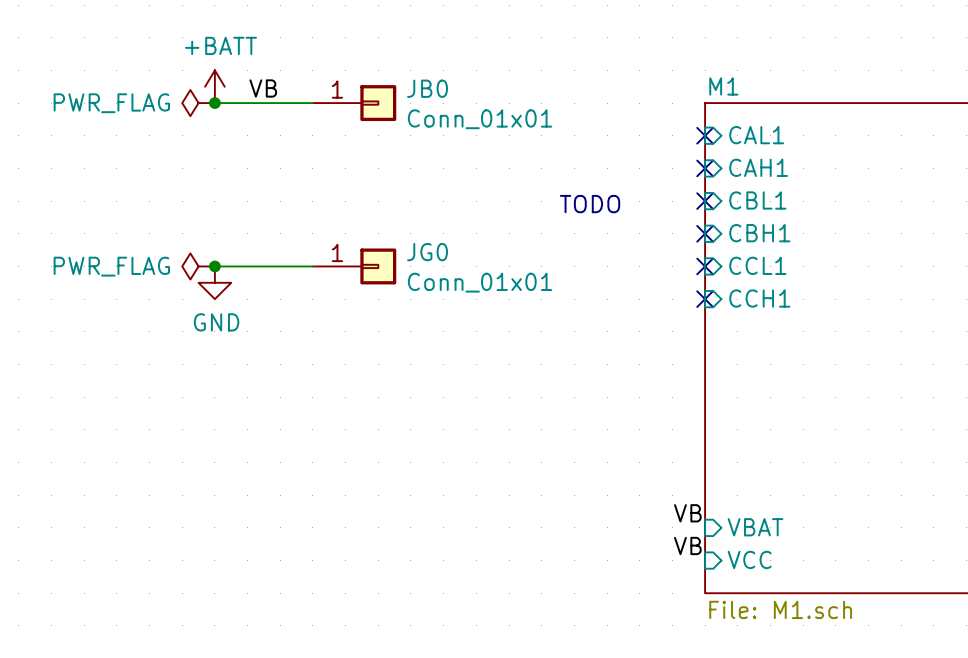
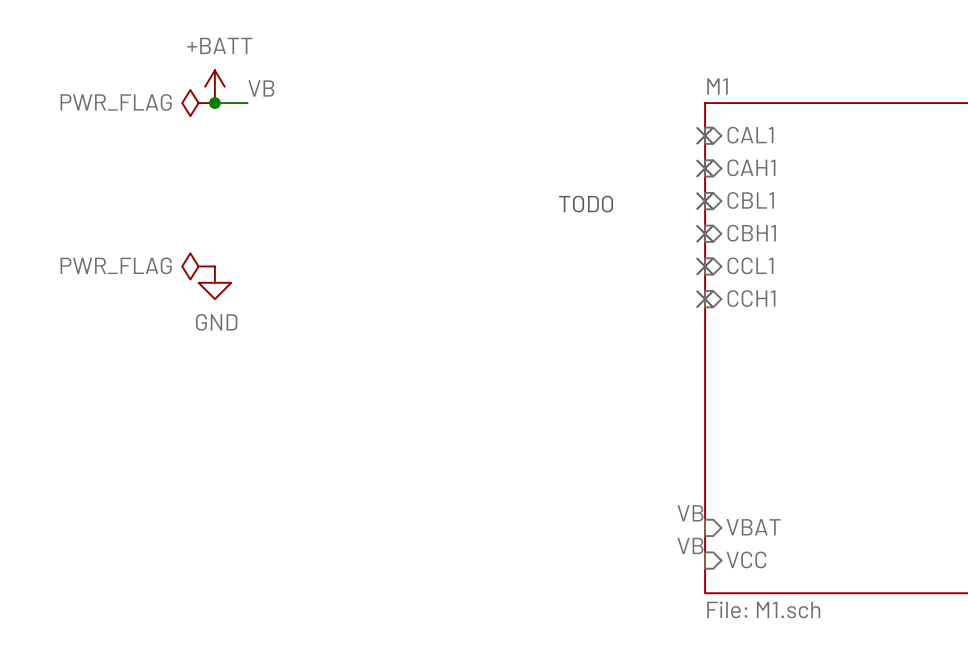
wire: (247, 103) (312, 103) -> none
JB0: Conn_01x01 (354, 103) -> none
wire: (214, 266) (312, 266) -> none
junction: (214, 266) -> none
JG0: Conn_01x01 (354, 266) -> none

